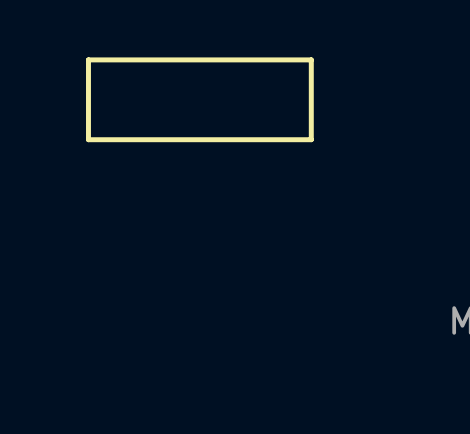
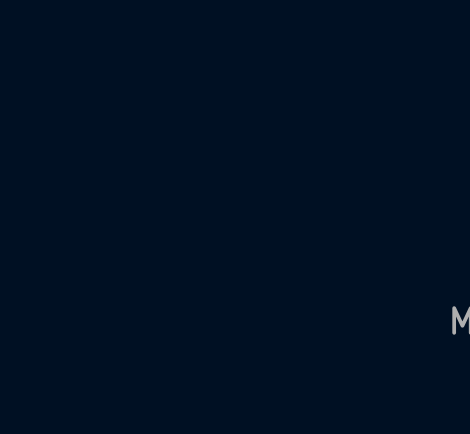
line: (88, 59) (311, 59) (311, 139) (88, 139) (88, 59) -> none

